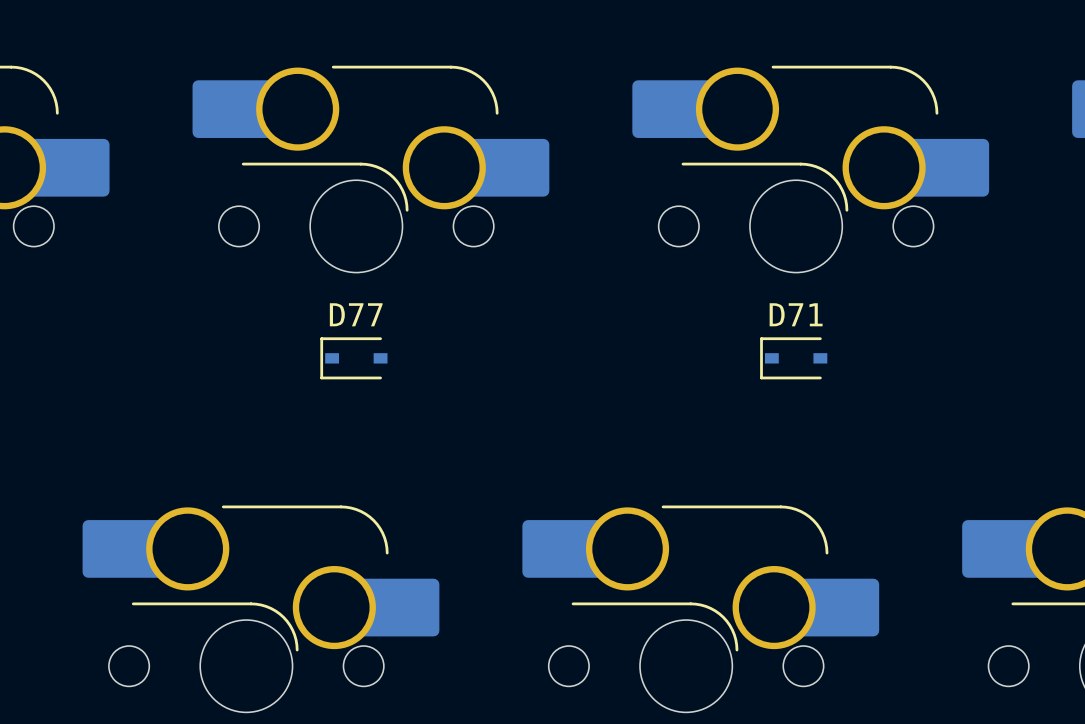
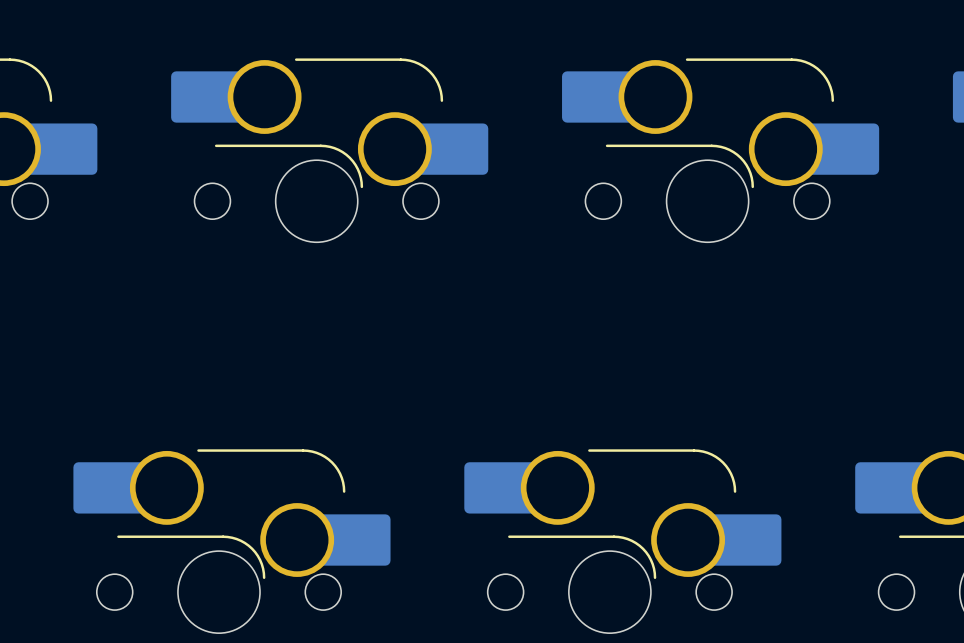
D77: (353, 358) -> none
D71: (793, 358) -> none

